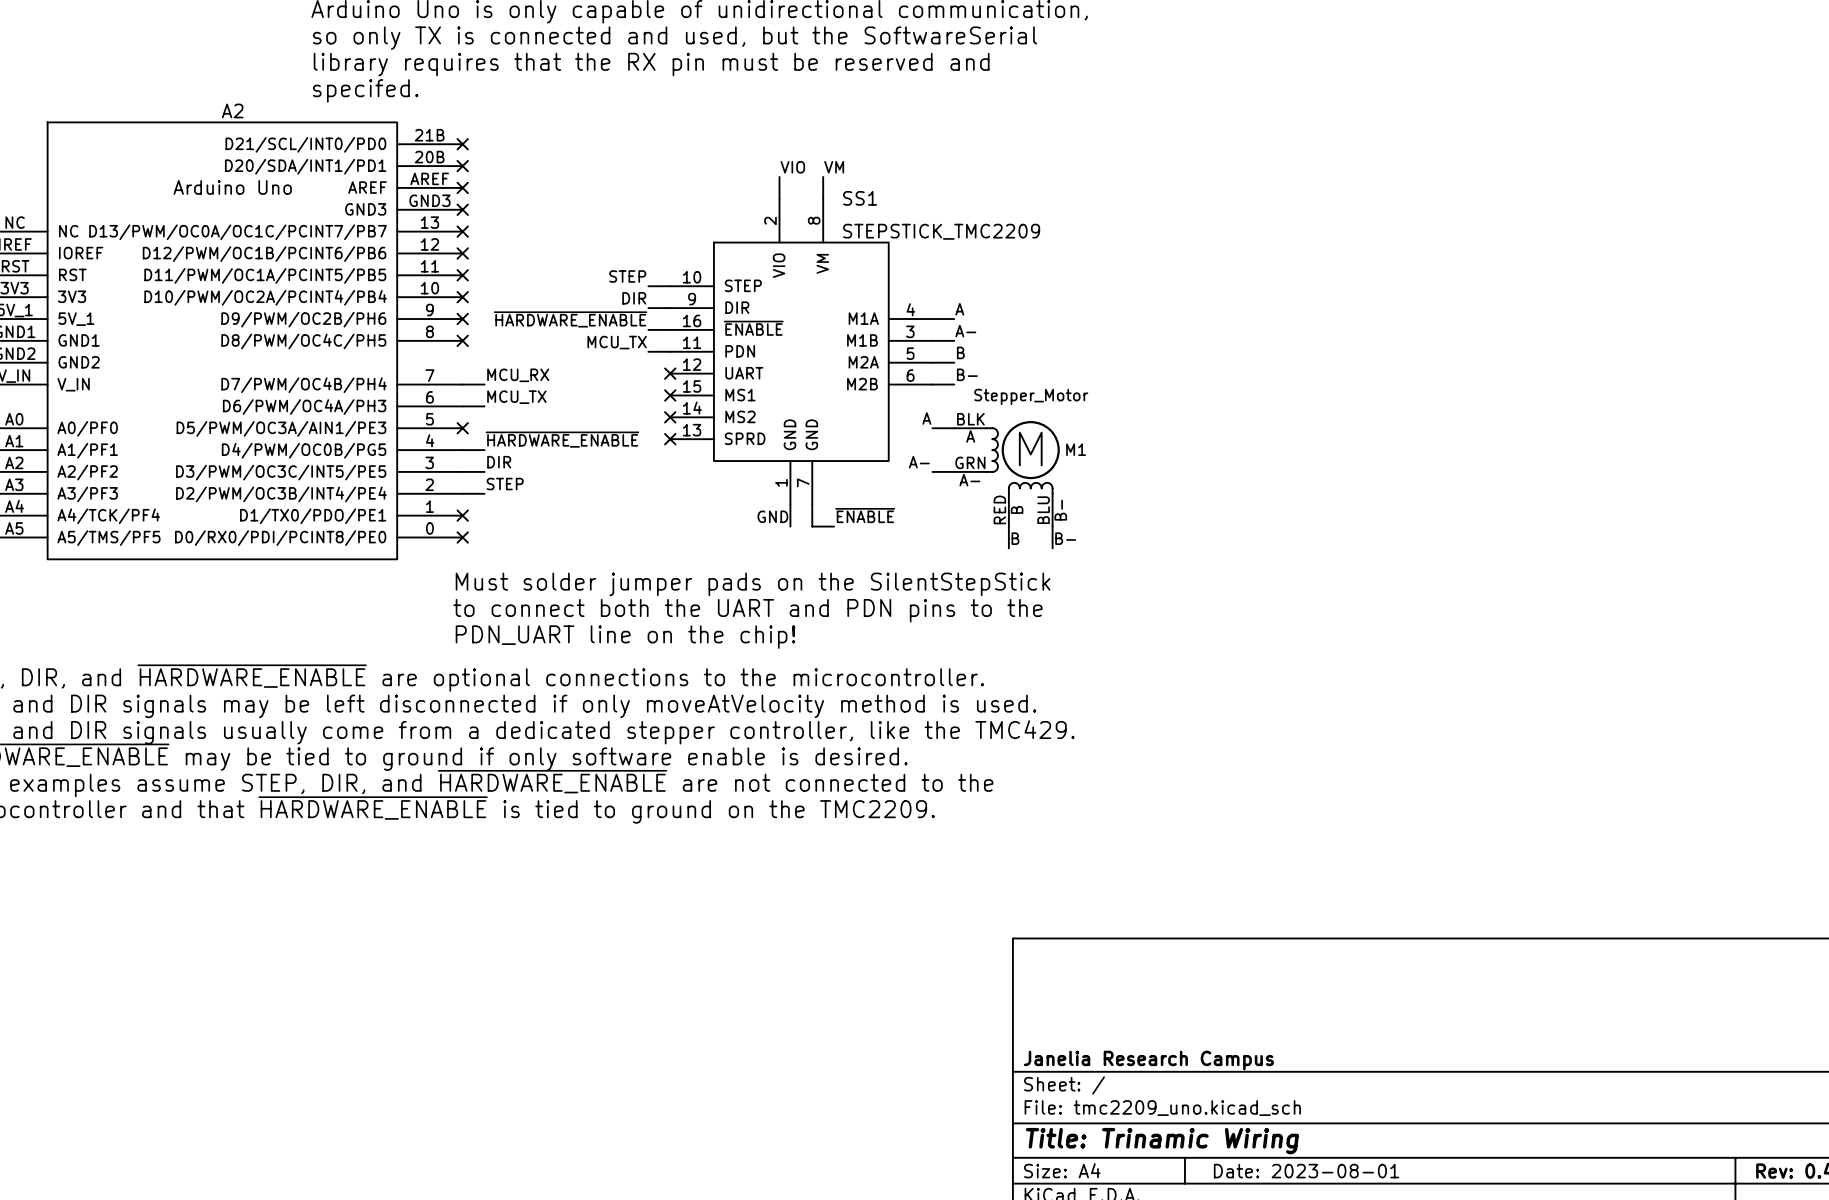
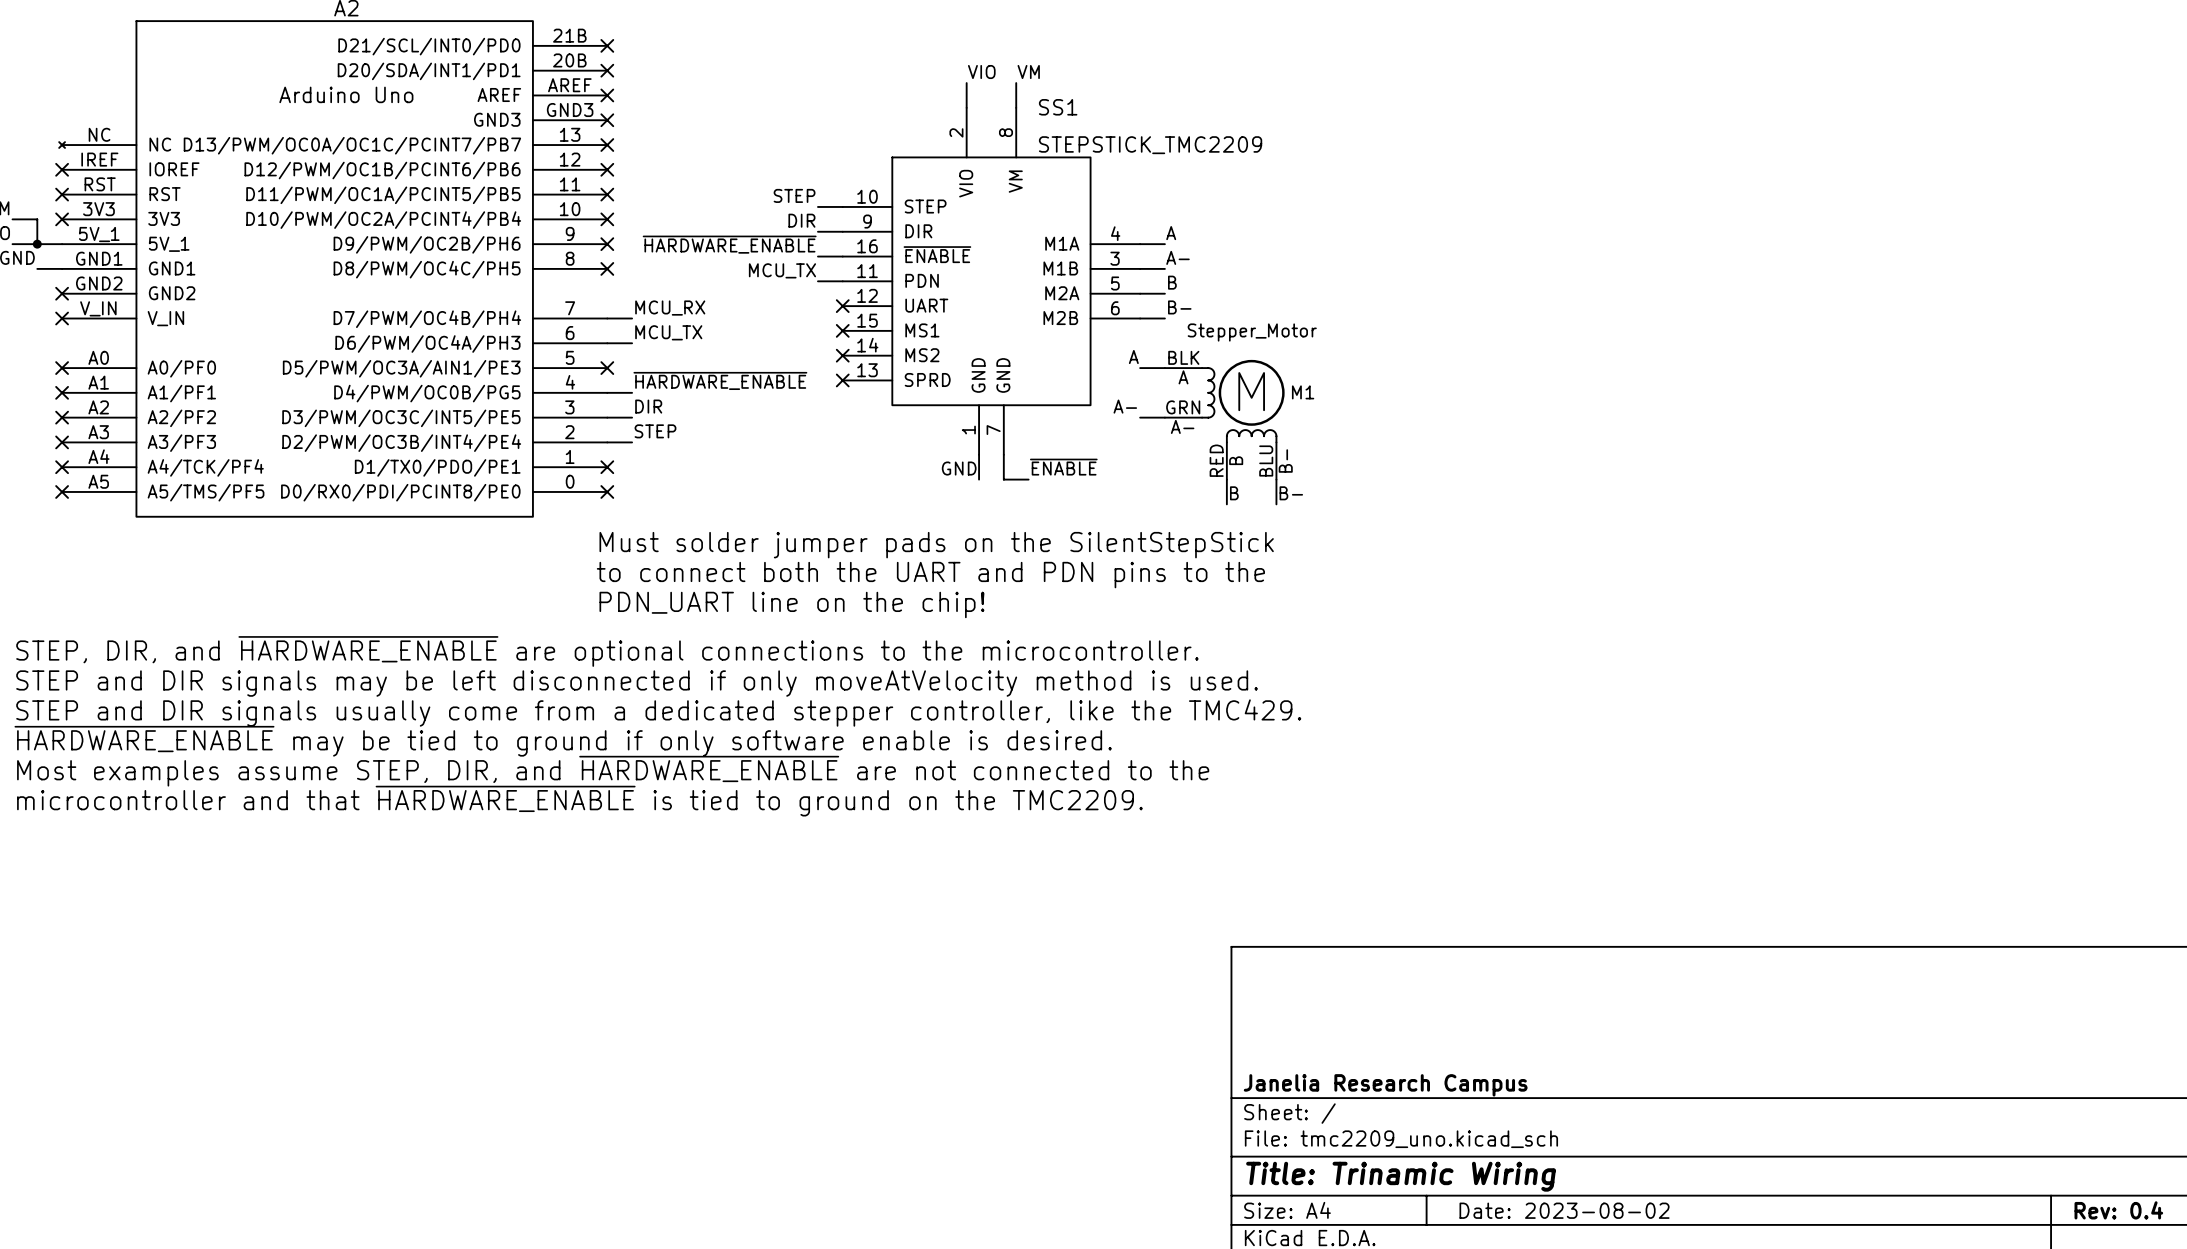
title block: Date: 2023-08-01 (1306, 1171) -> Date: 2023-08-02 (1564, 1210)

